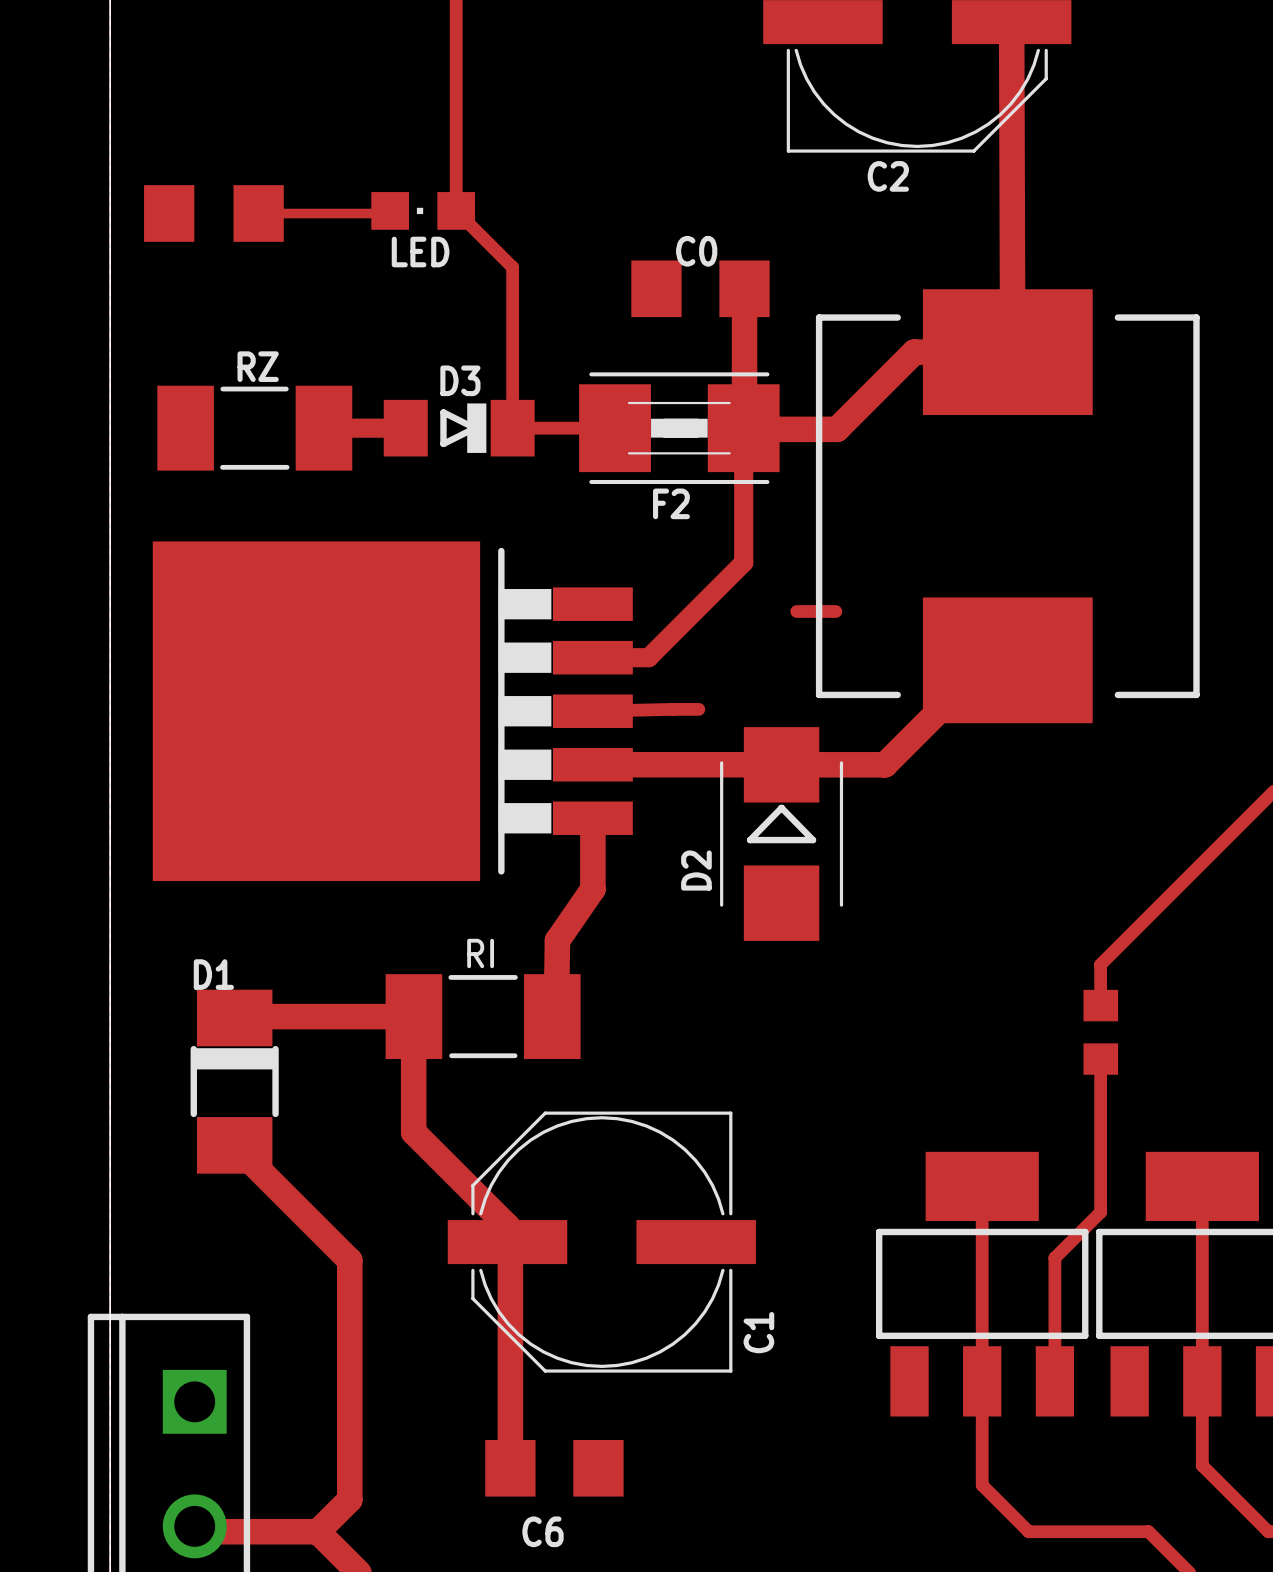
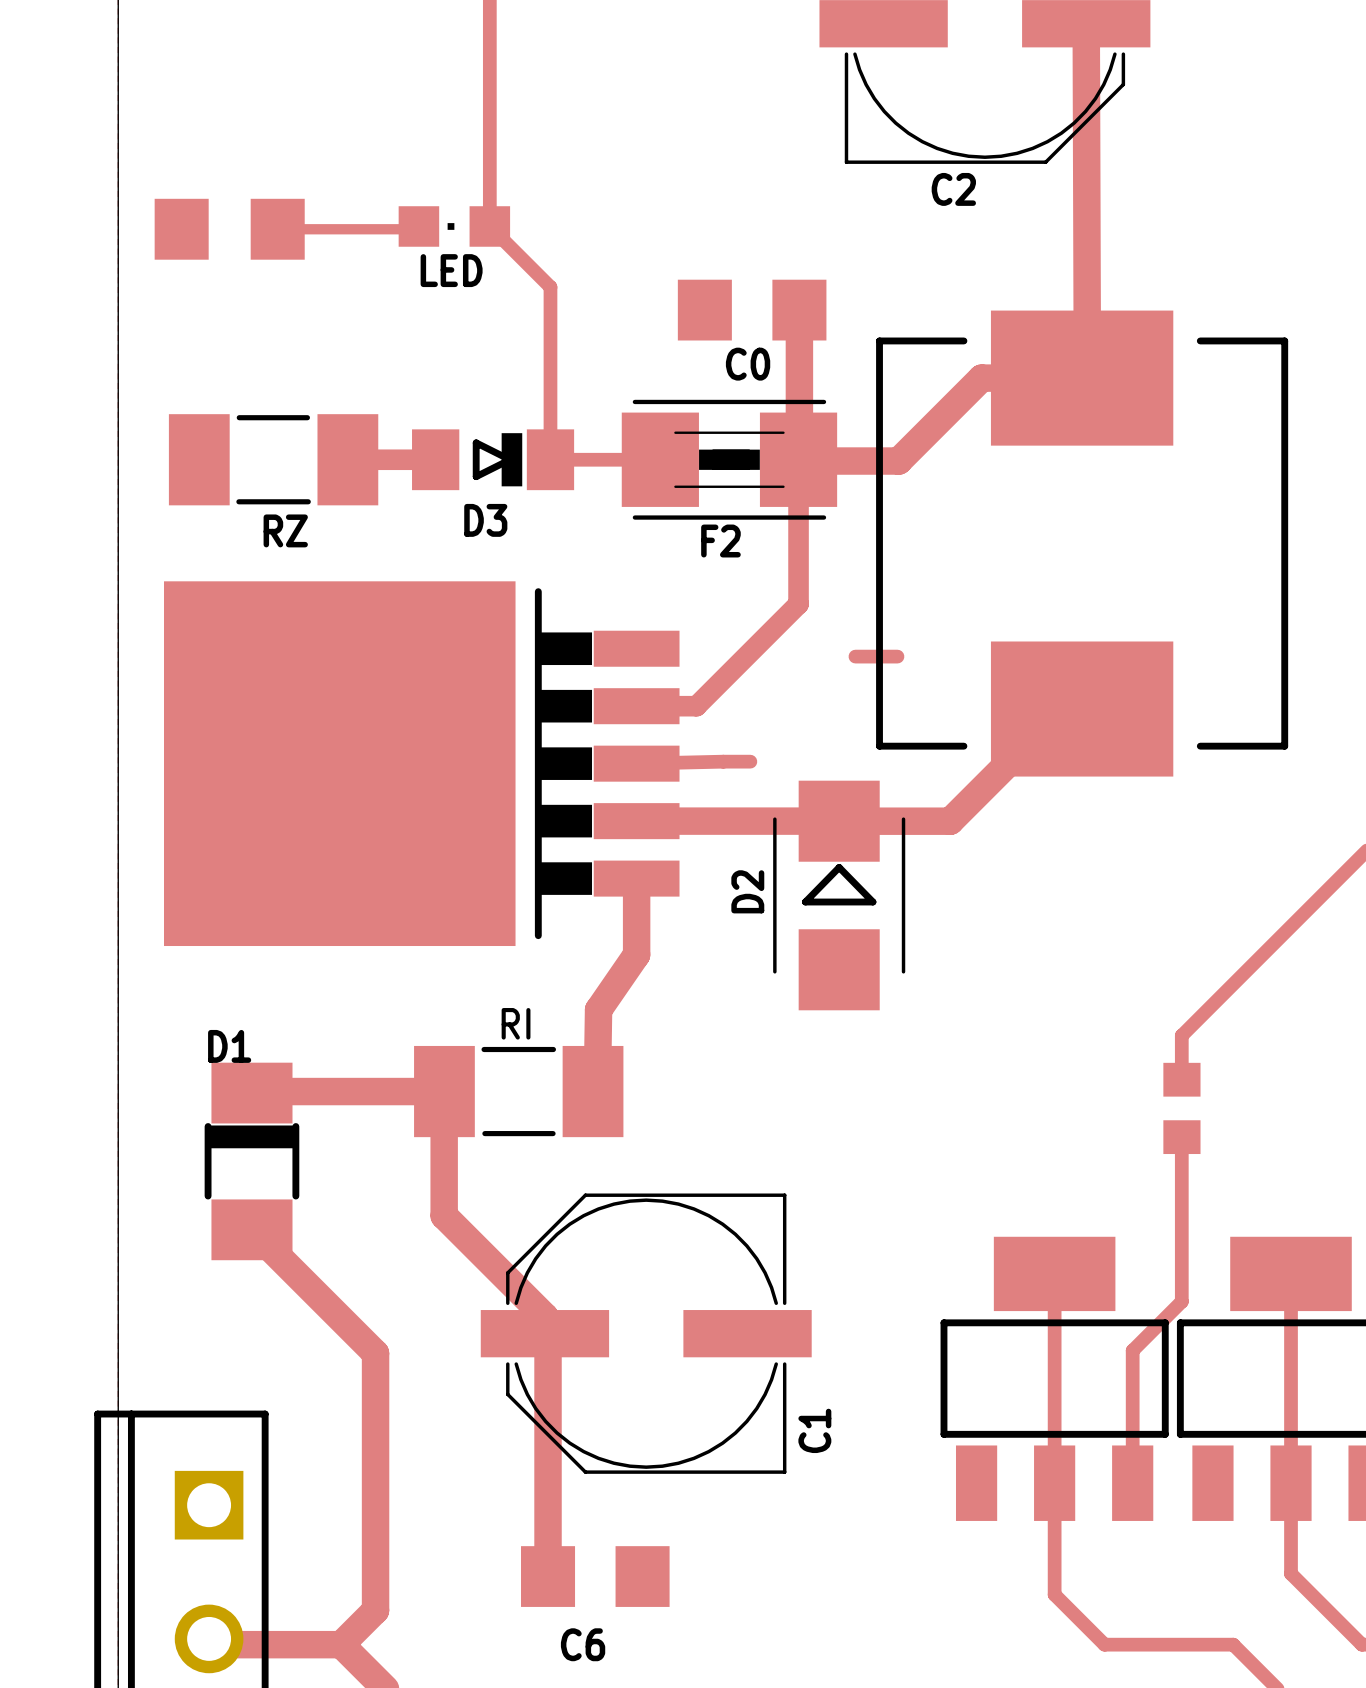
C0 name position: C0 (696, 251) -> C0 (748, 364)
RZ name position: RZ (258, 366) -> RZ (285, 530)
D3 name position: D3 (460, 380) -> D3 (485, 520)
D2 name position: D2 (696, 870) -> D2 (747, 891)

